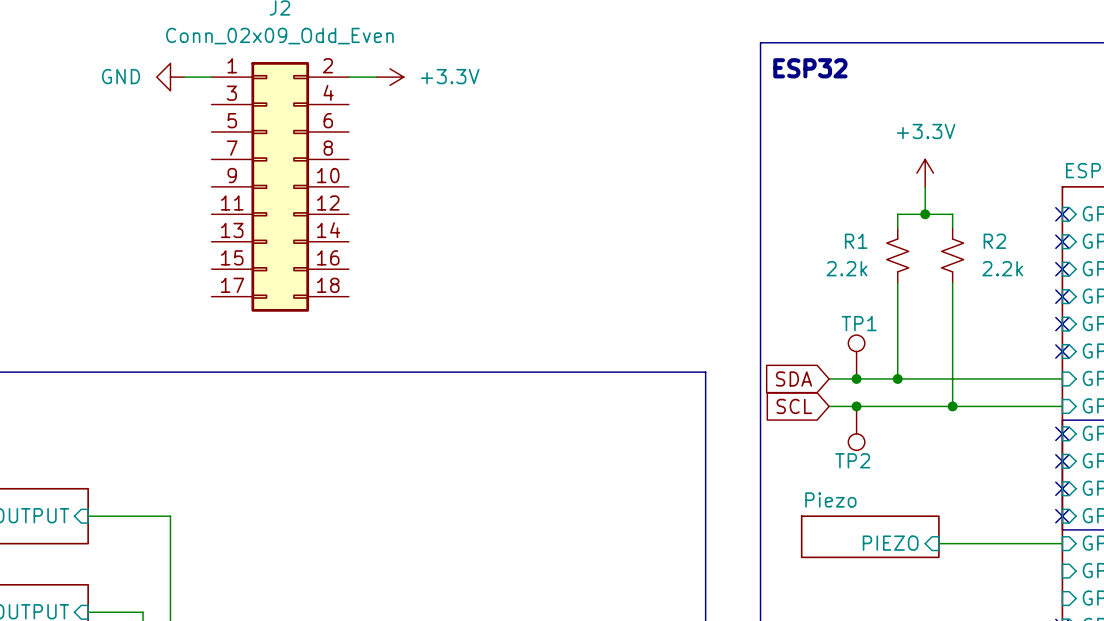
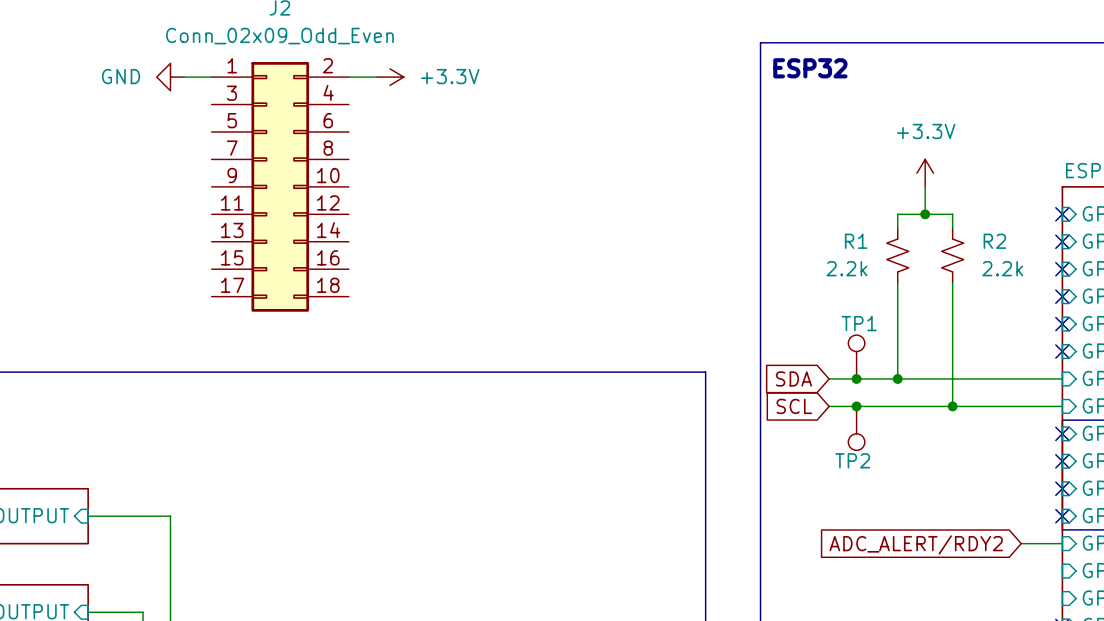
sheet Piezo: (870, 536) -> none
sheet pin: PIEZO (890, 543) -> none
wire: (938, 543) (1021, 543) -> none
global label: none -> ADC_ALERT/RDY2 (916, 544)

